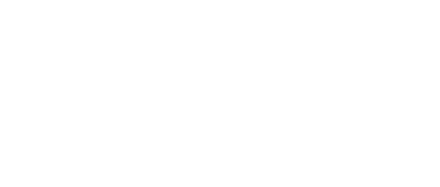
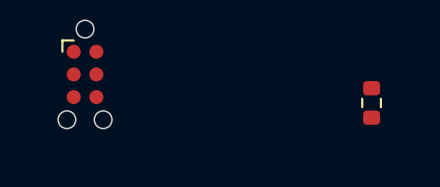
part: none -> (85, 74)
part: none -> (371, 102)

